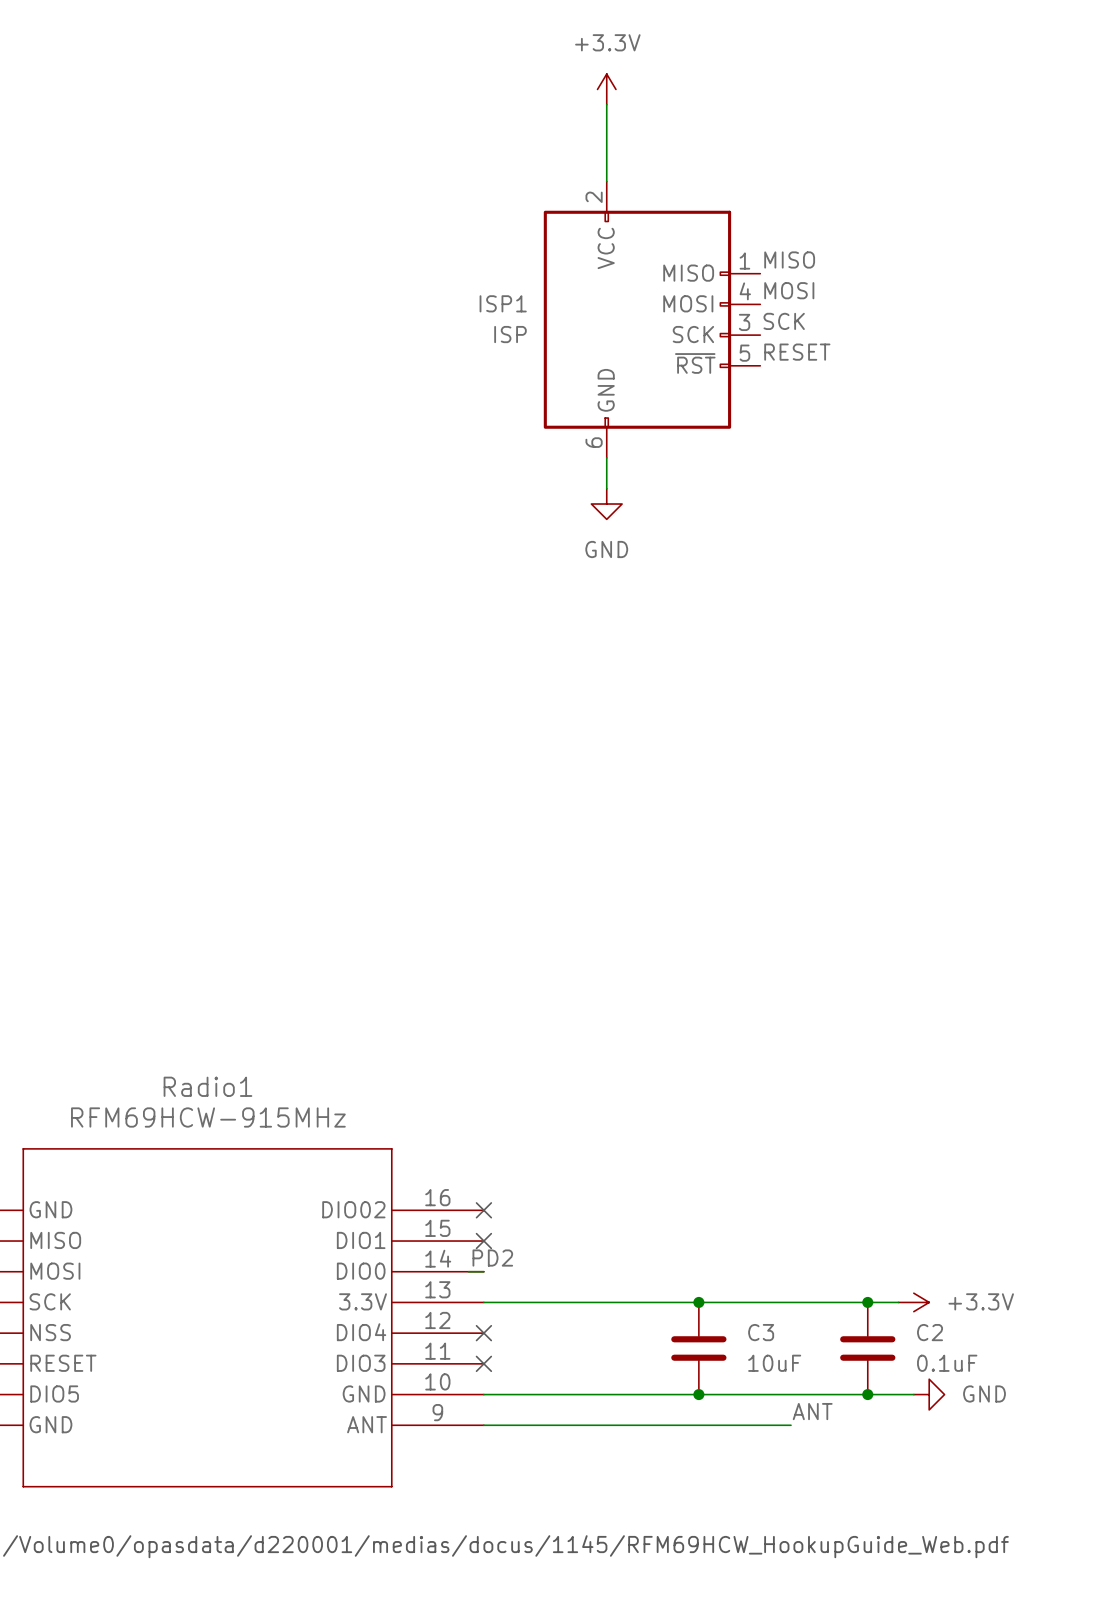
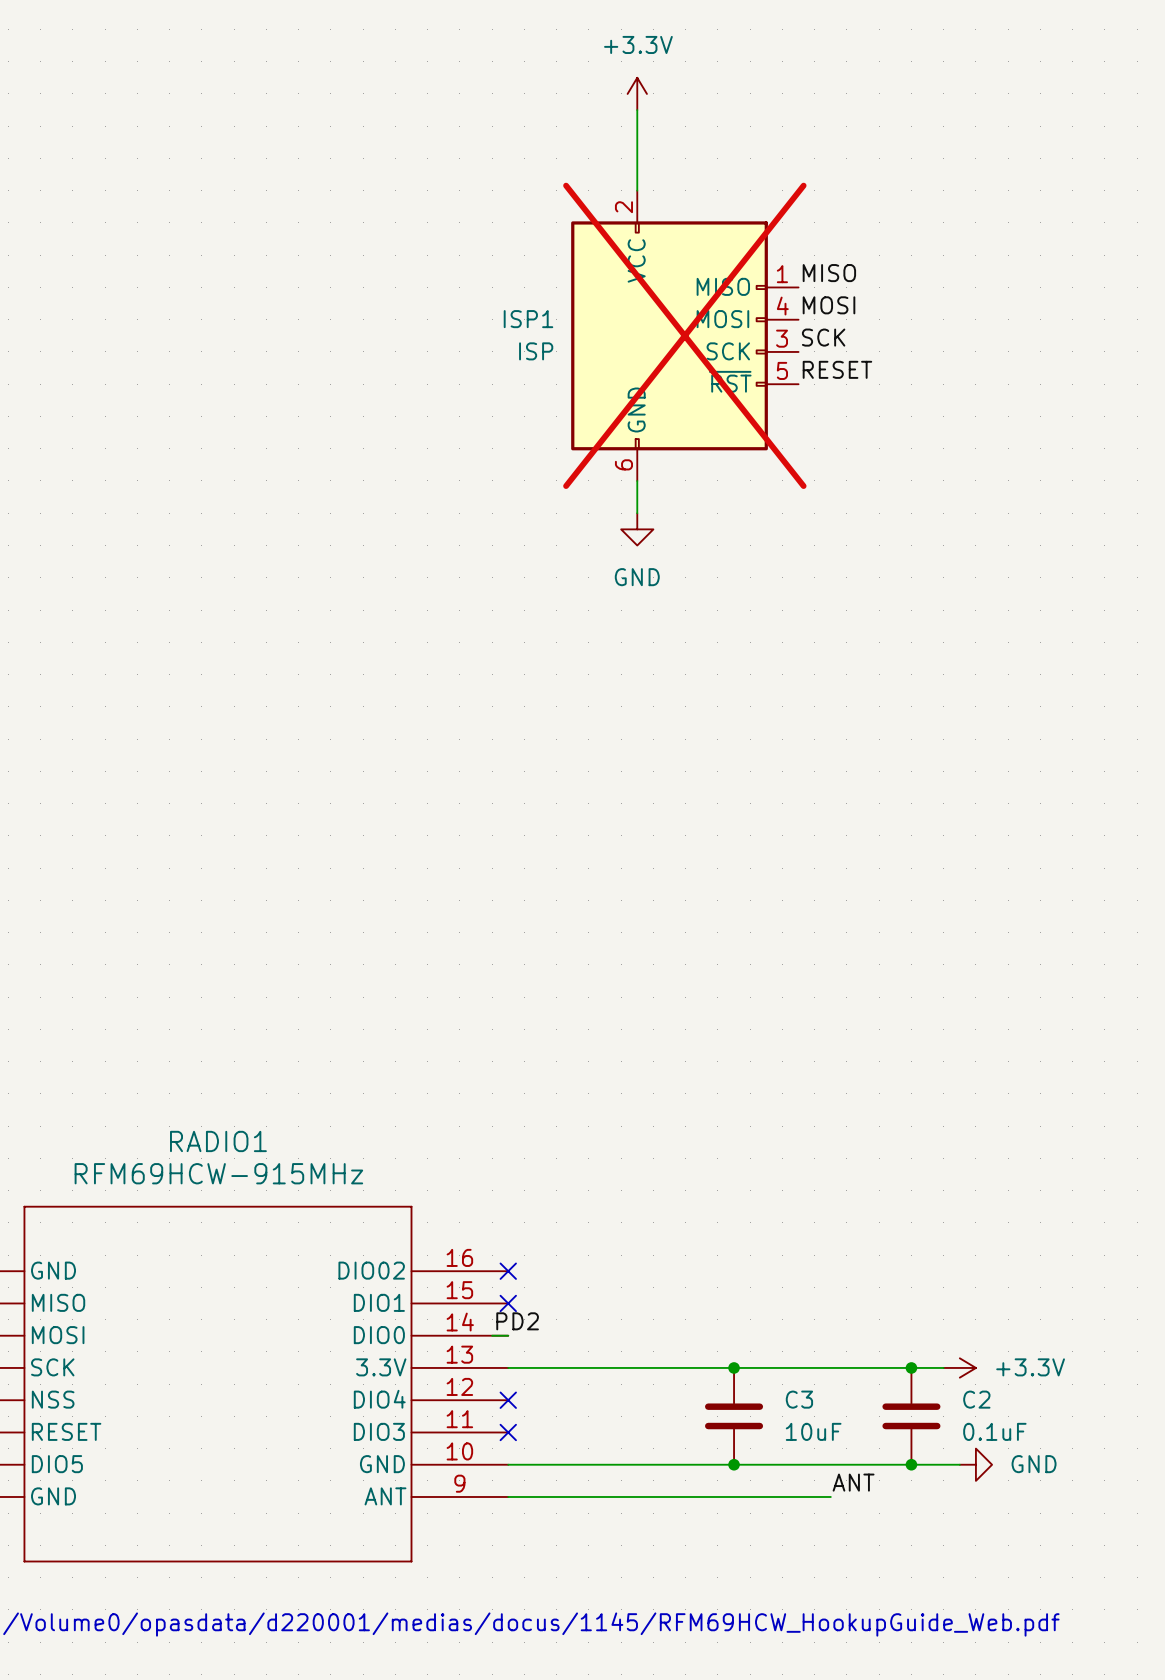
ISP1 do-not-place cross: none -> (684, 335)
Radio1 name: Radio1 (207, 1086) -> RADIO1 (218, 1141)

